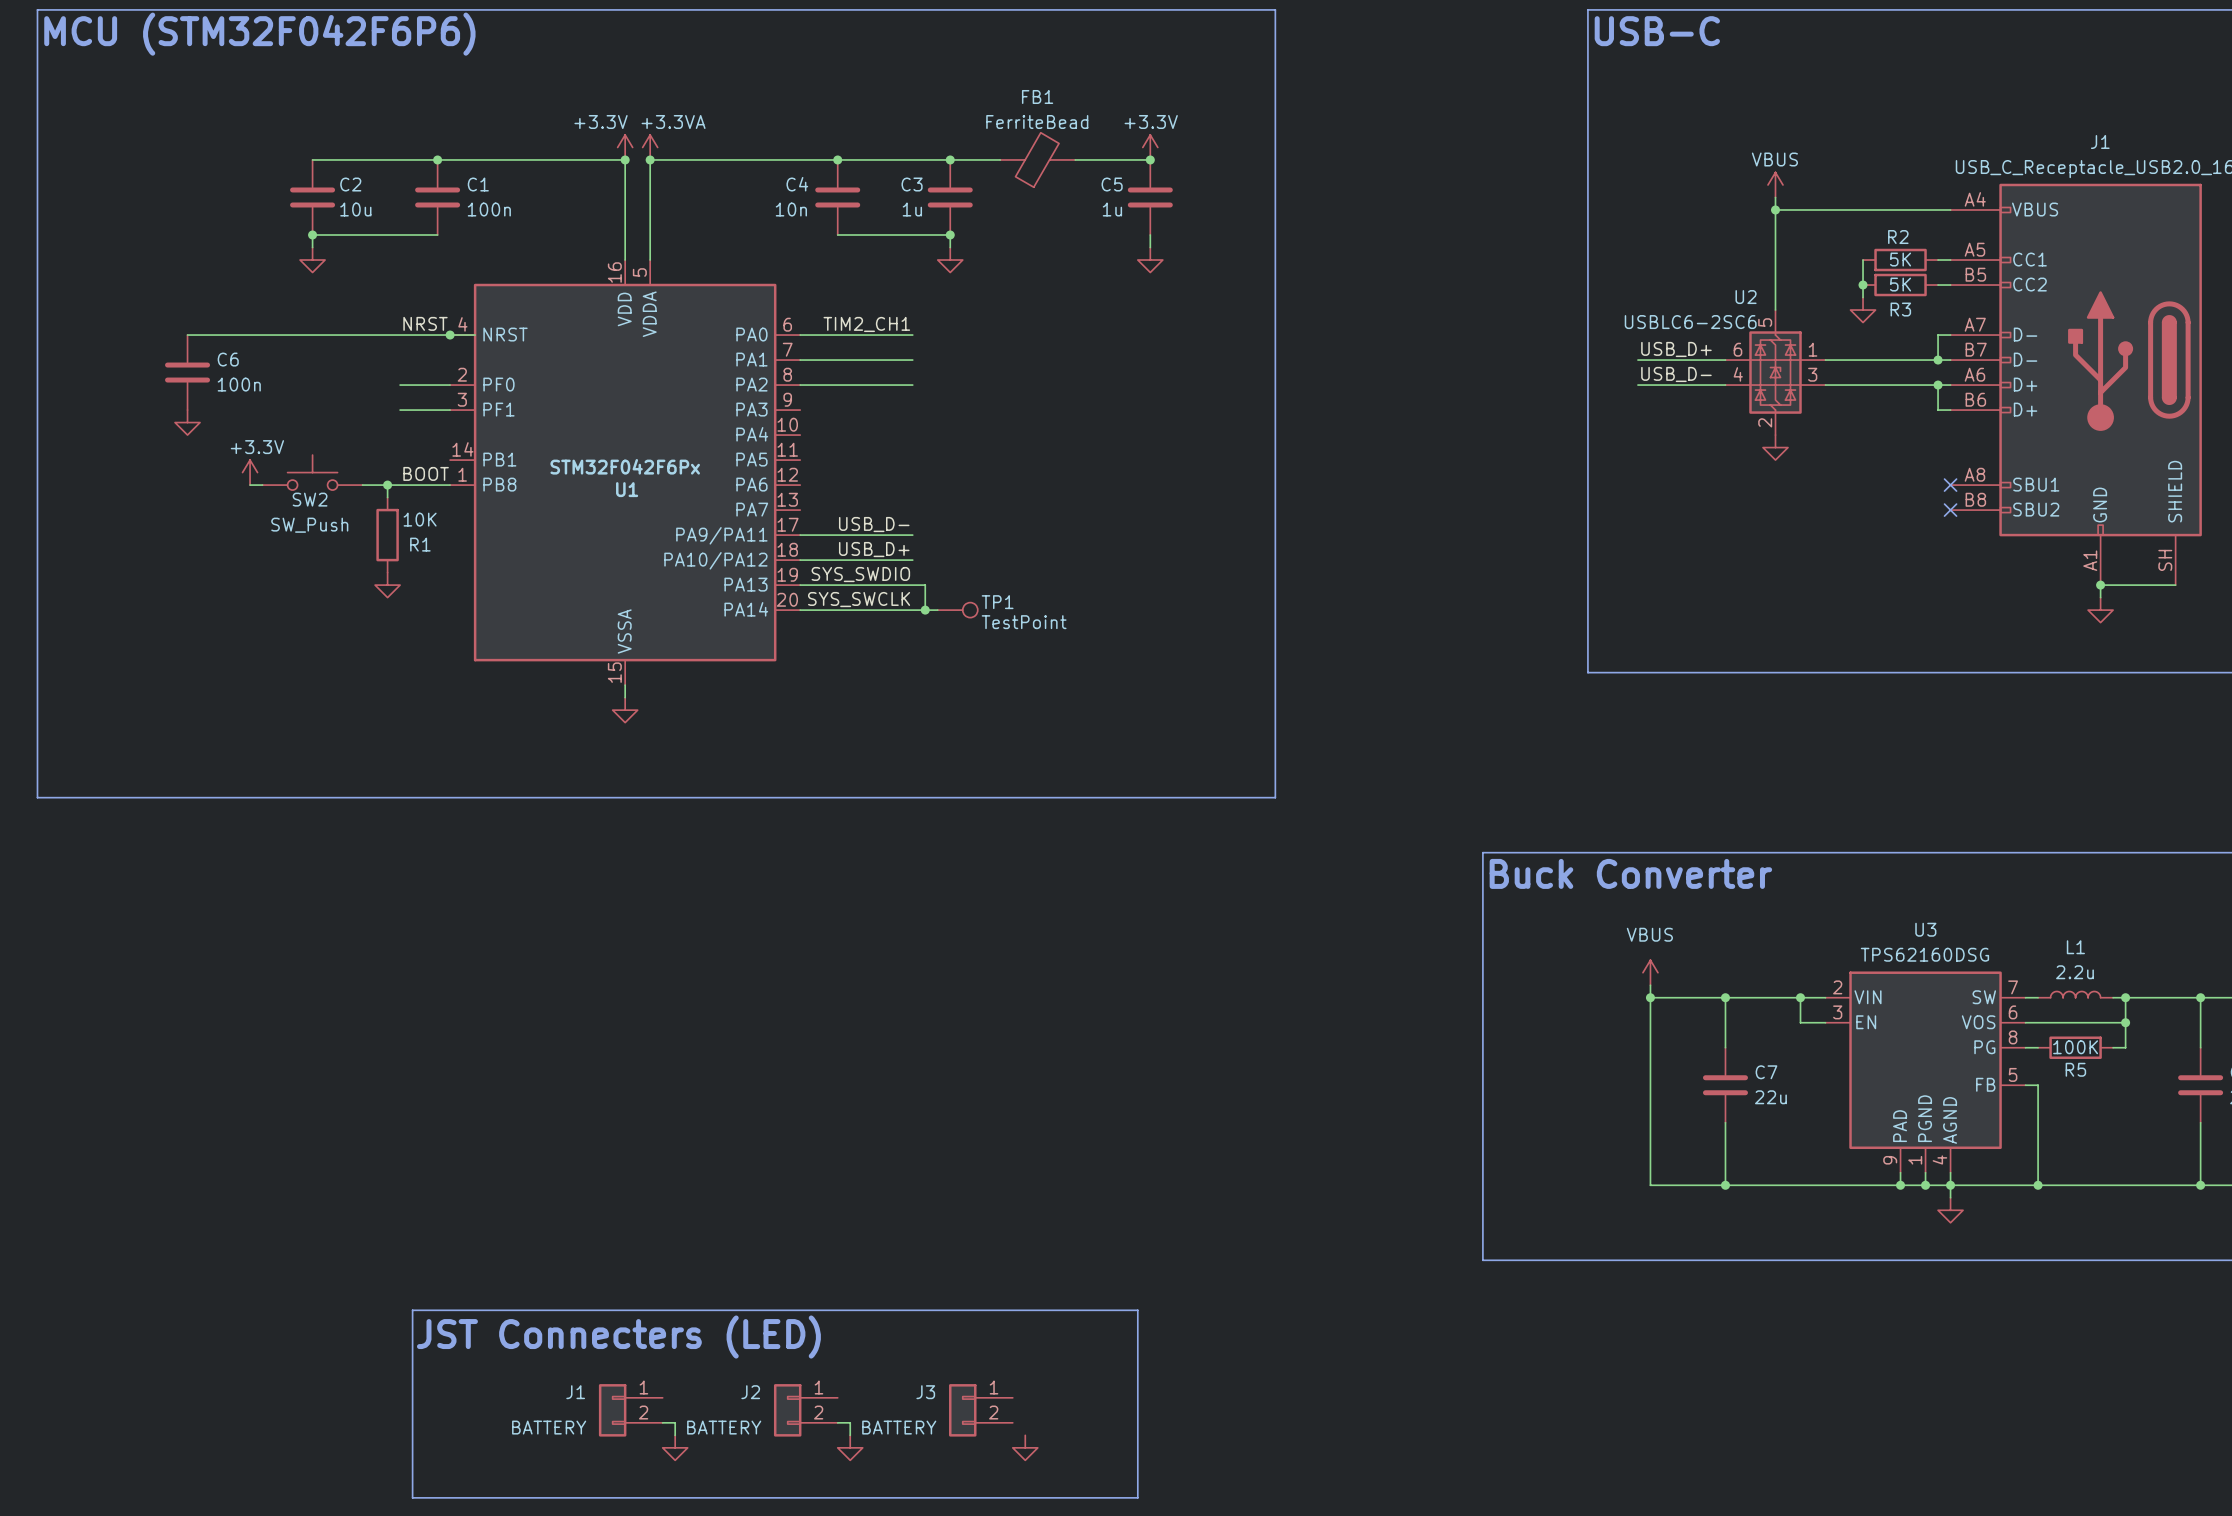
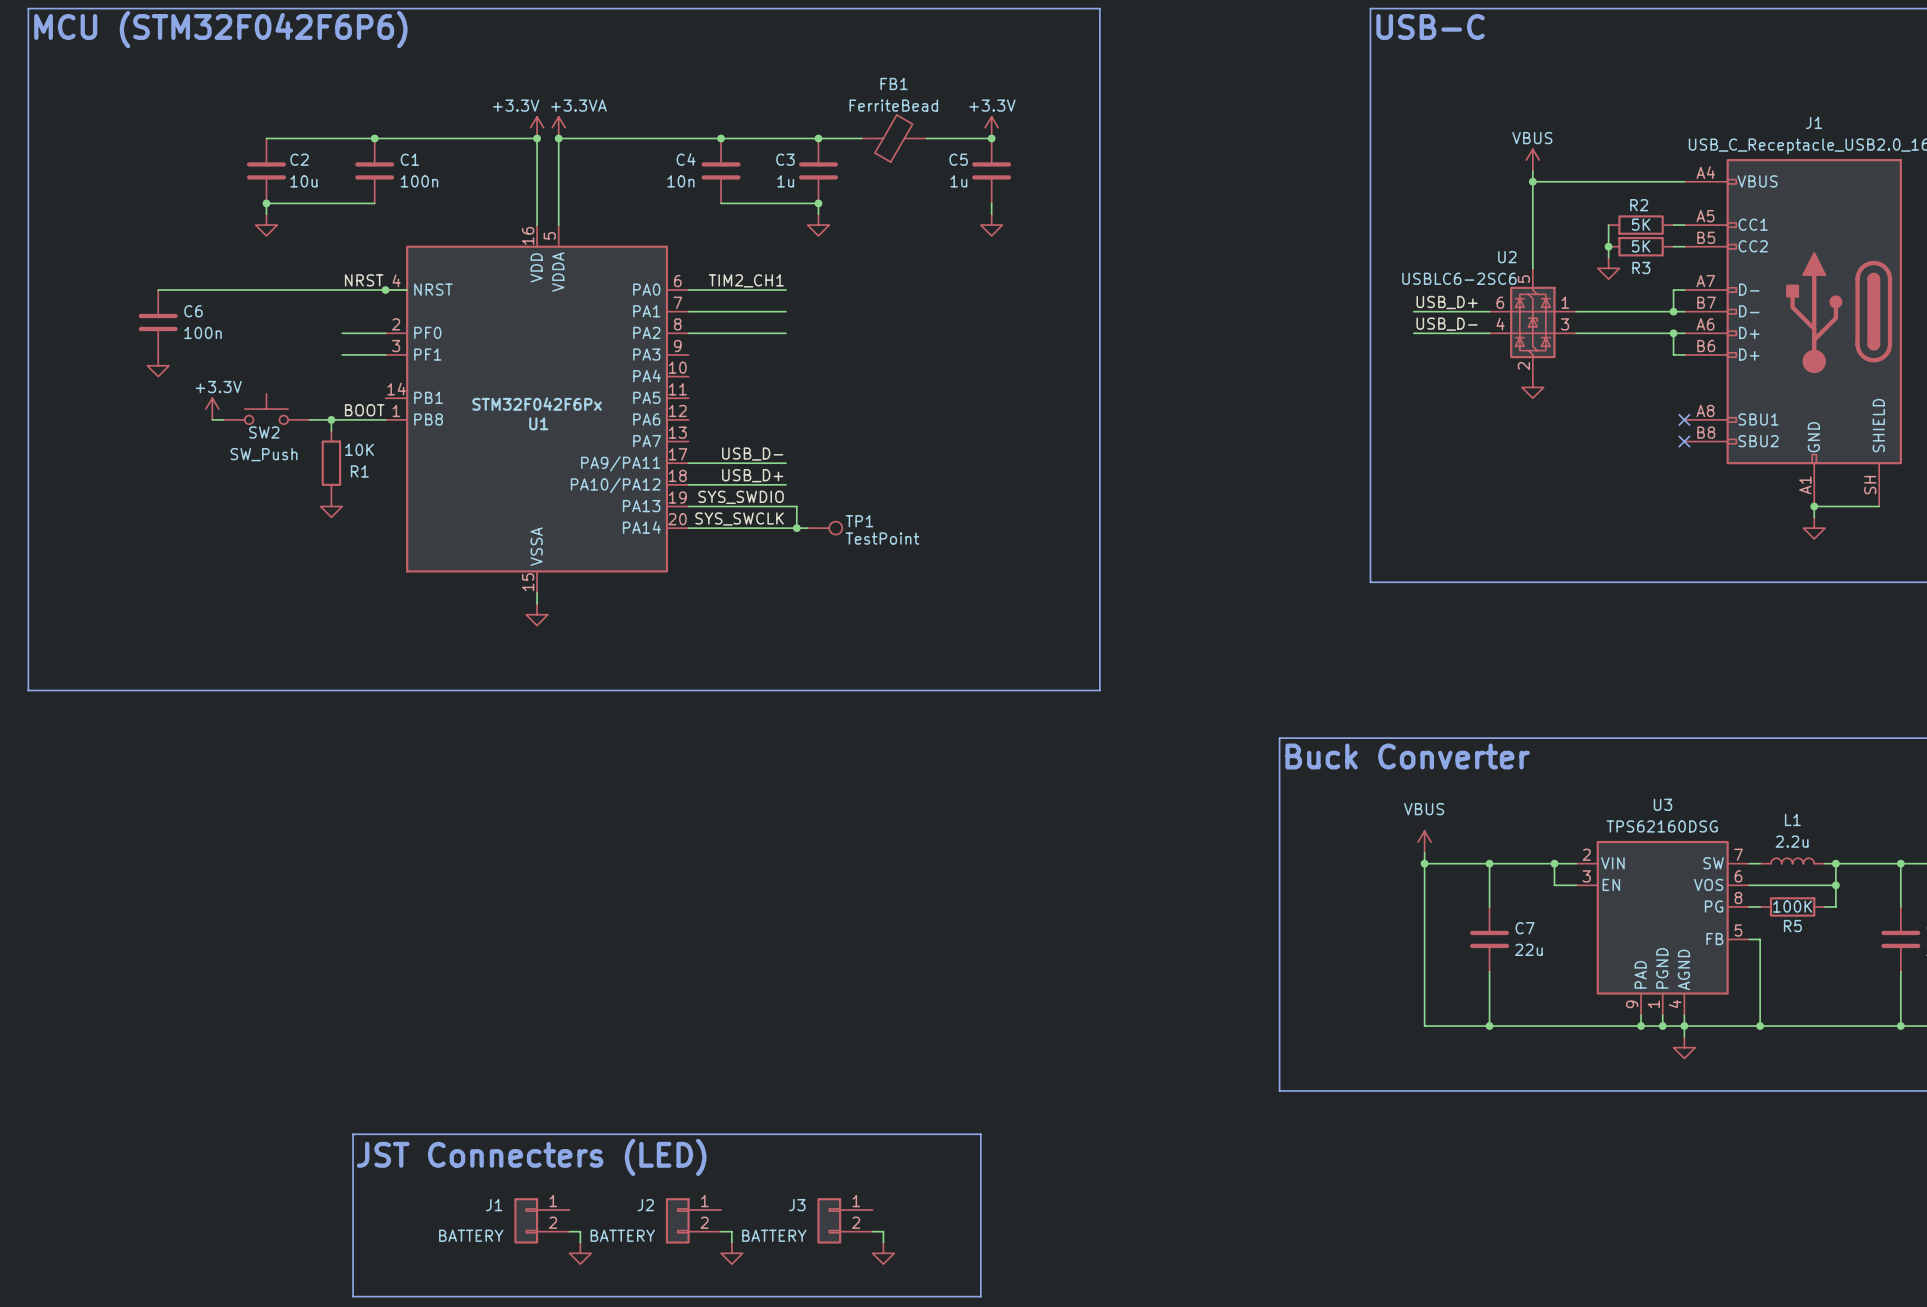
wire: none -> (872, 1231) (883, 1231) (883, 1242)

